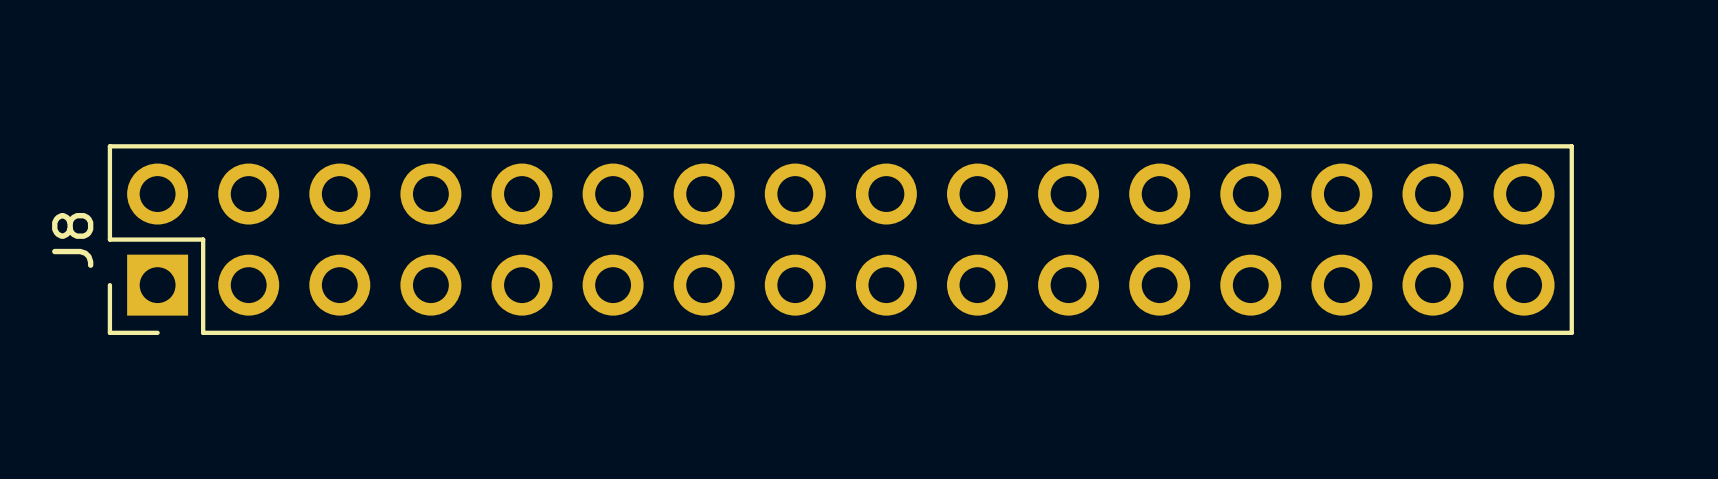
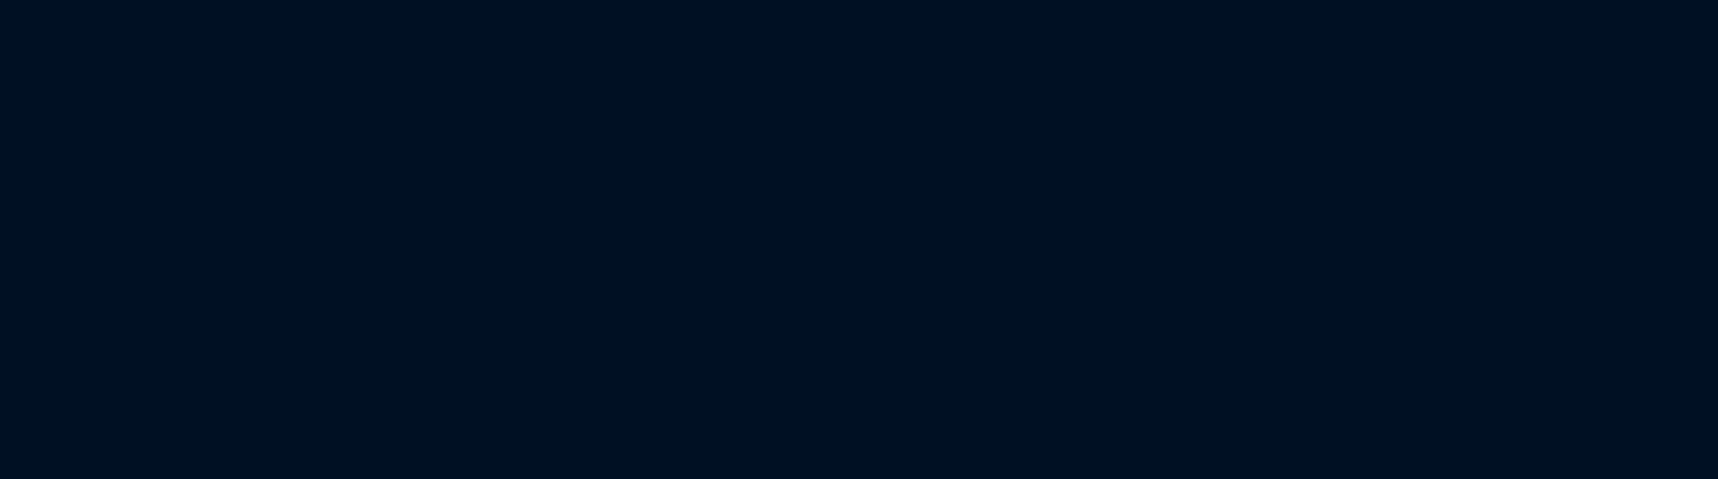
J8: (840, 239) -> none

